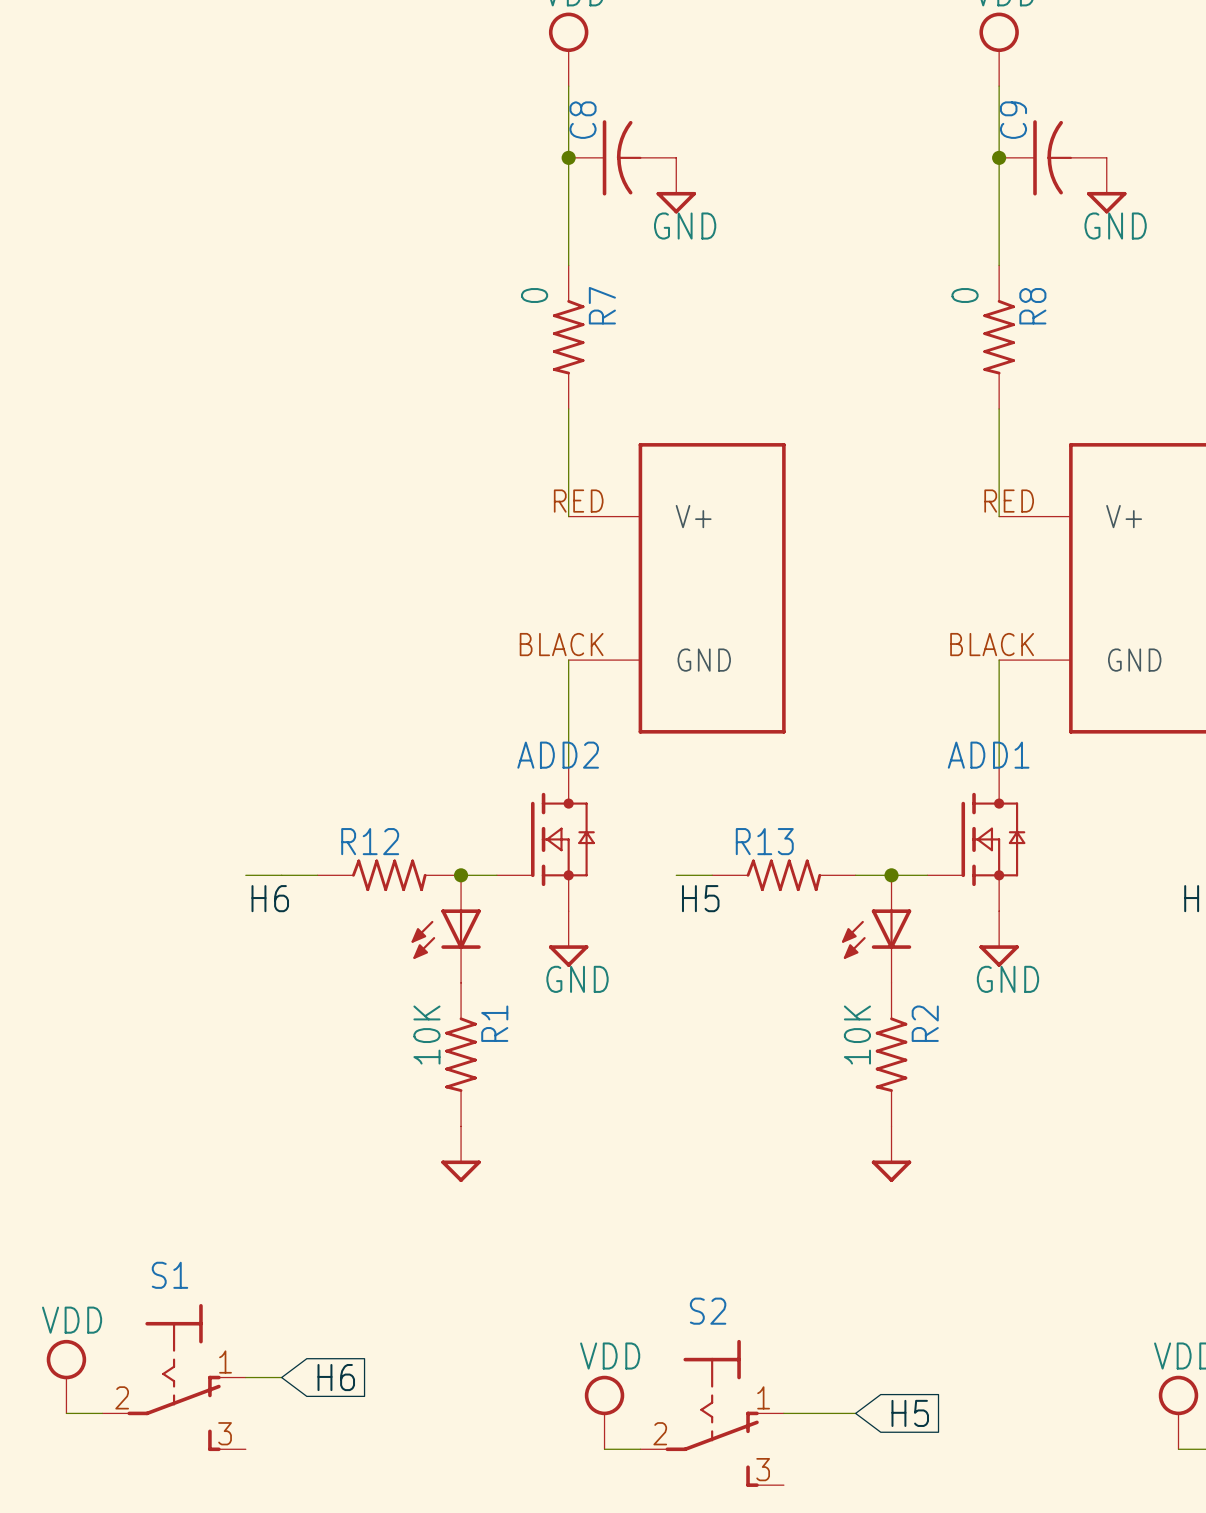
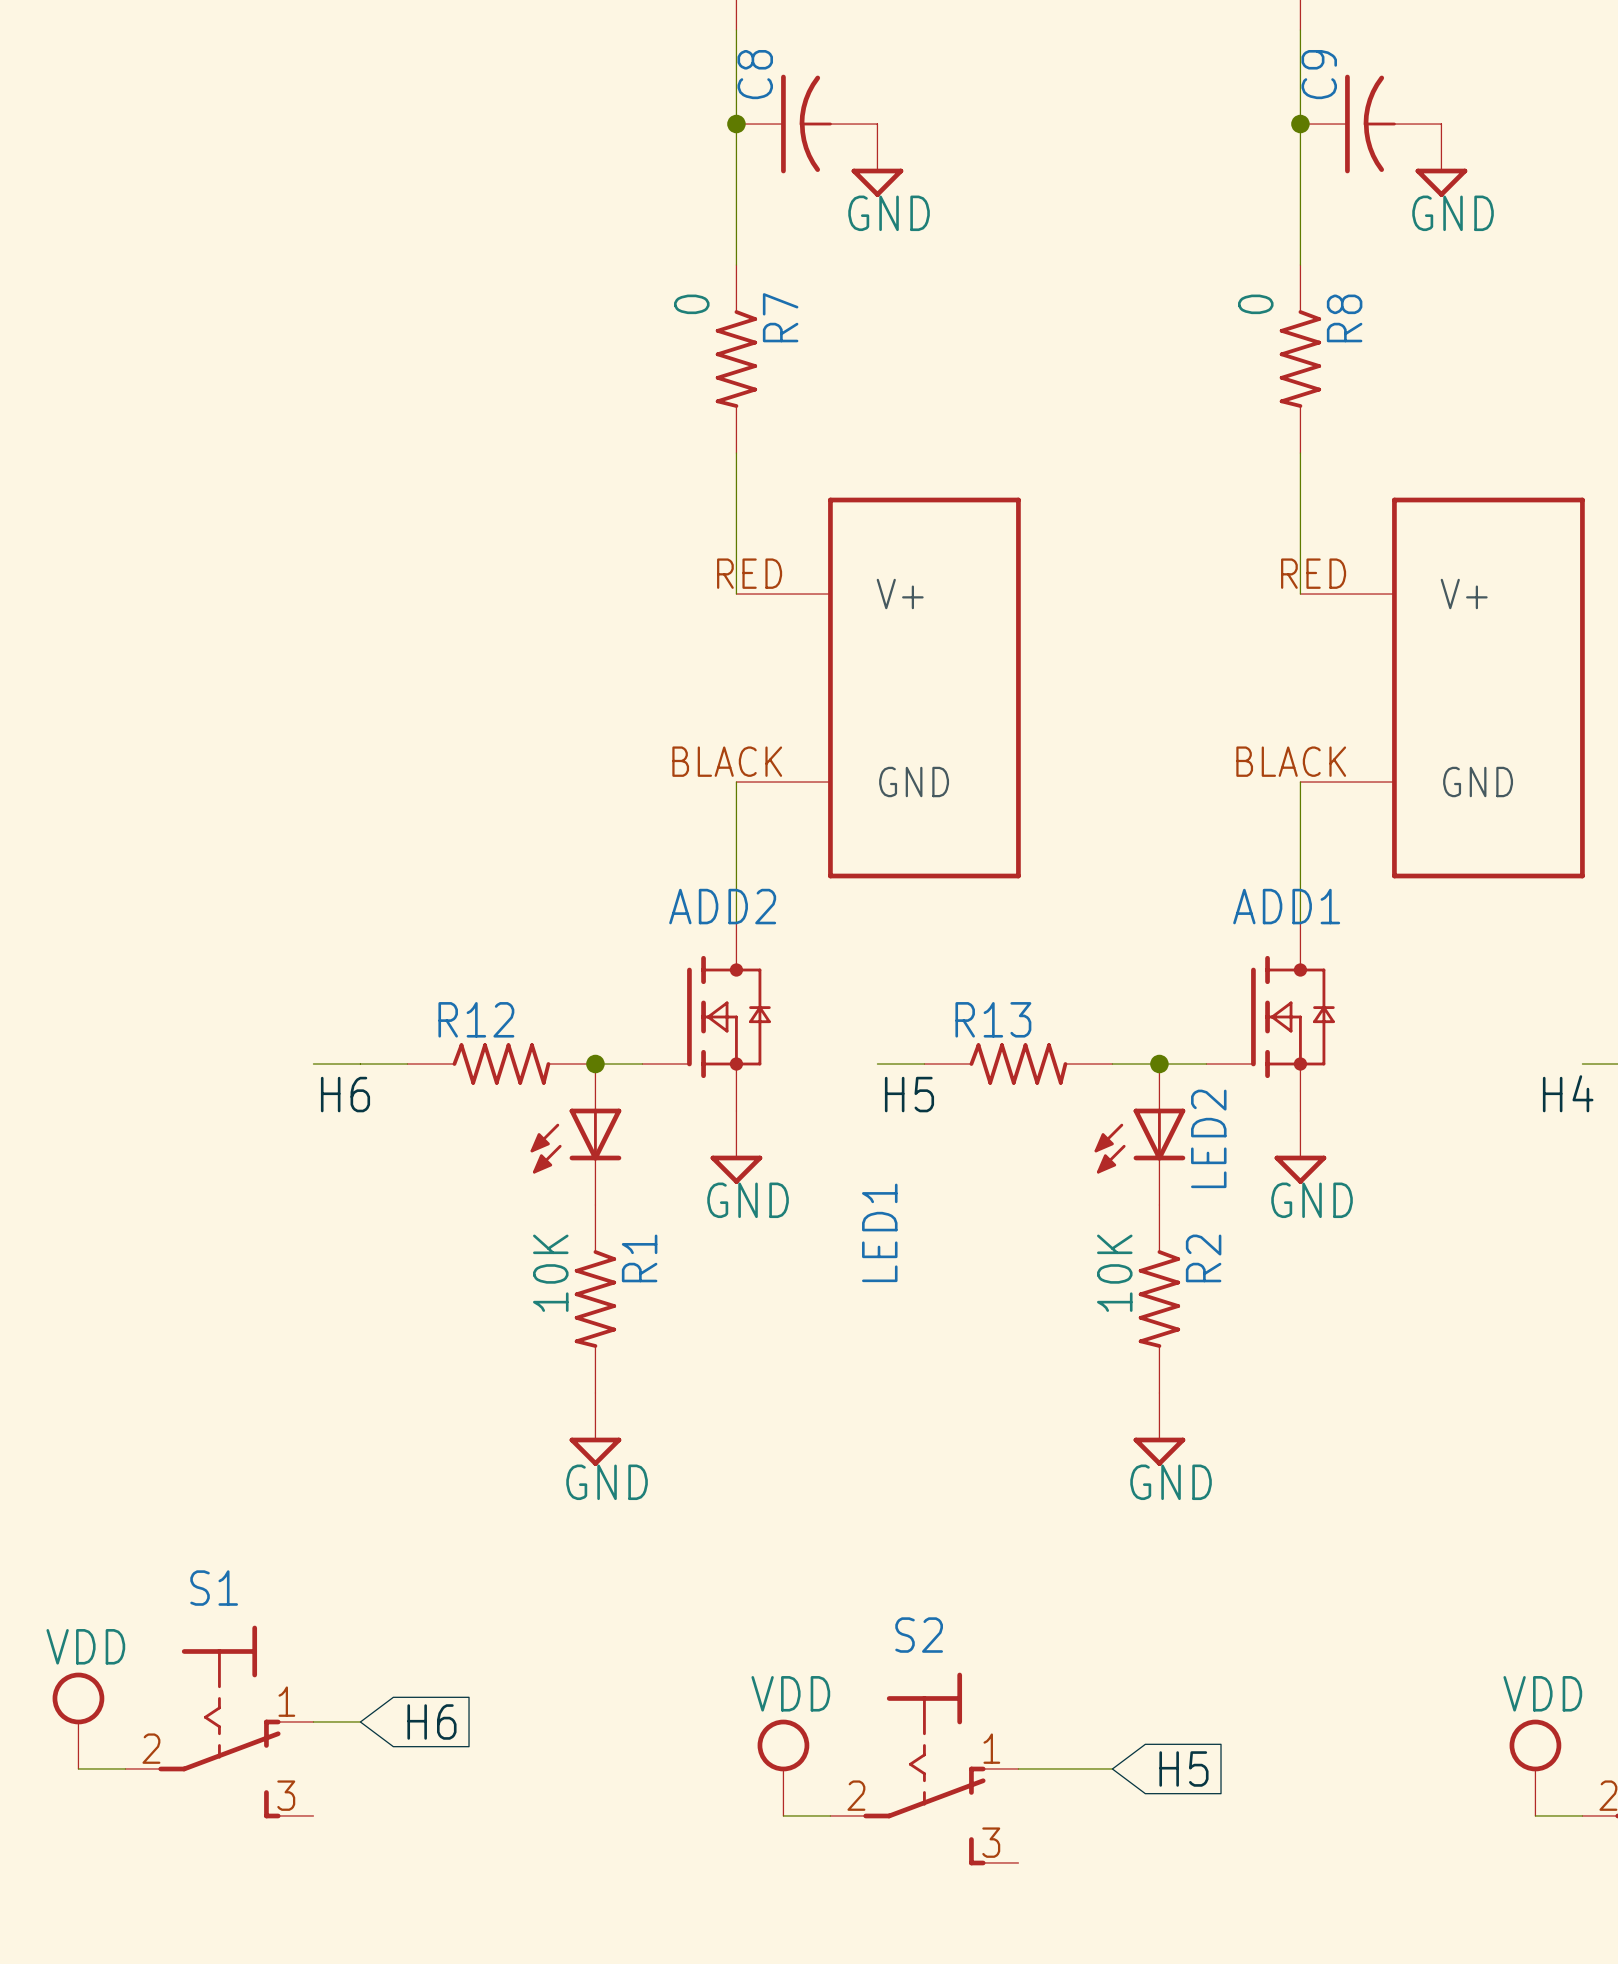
LED2 name: none -> LED2 (1208, 1138)
LED1 name: none -> LED1 (879, 1232)
power symbol text: none -> GND (607, 1482)
power symbol text: none -> GND (1171, 1482)

